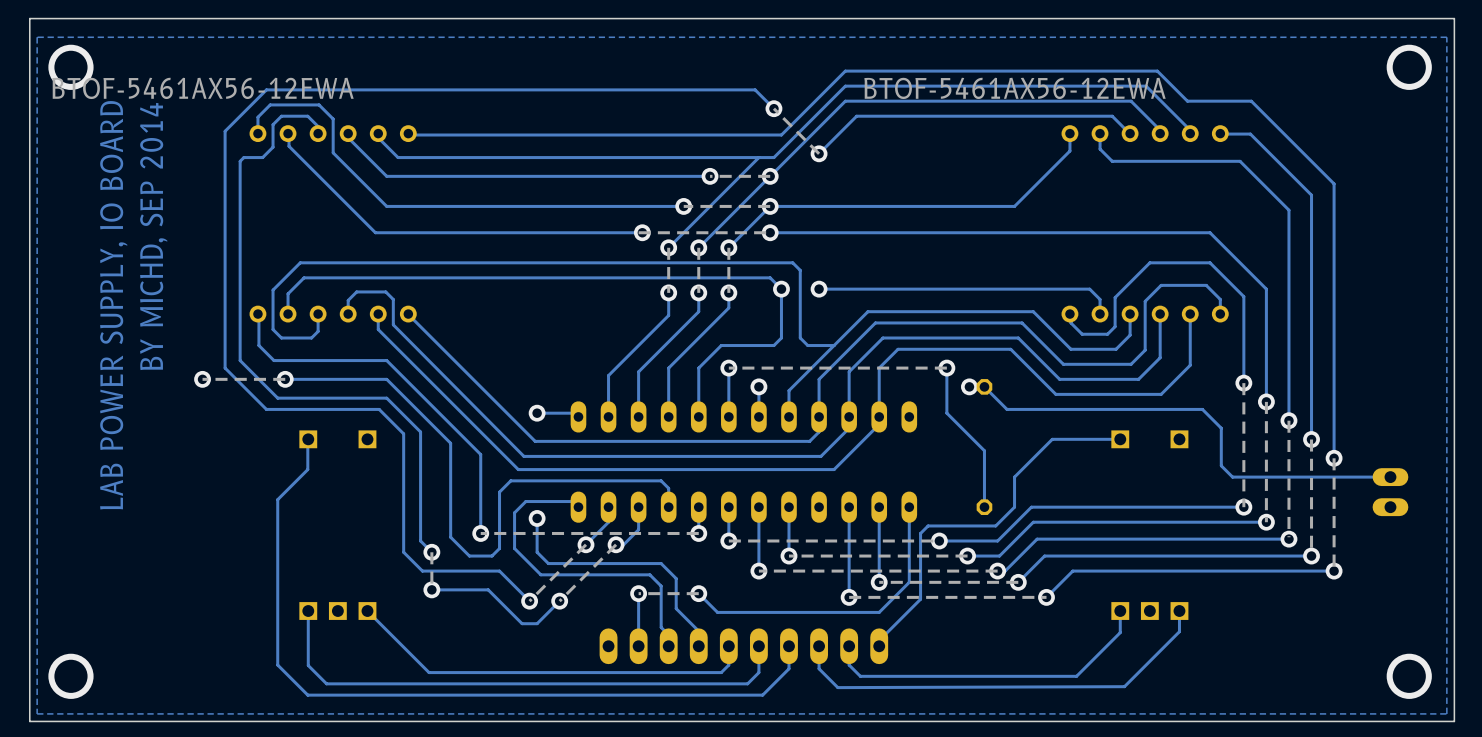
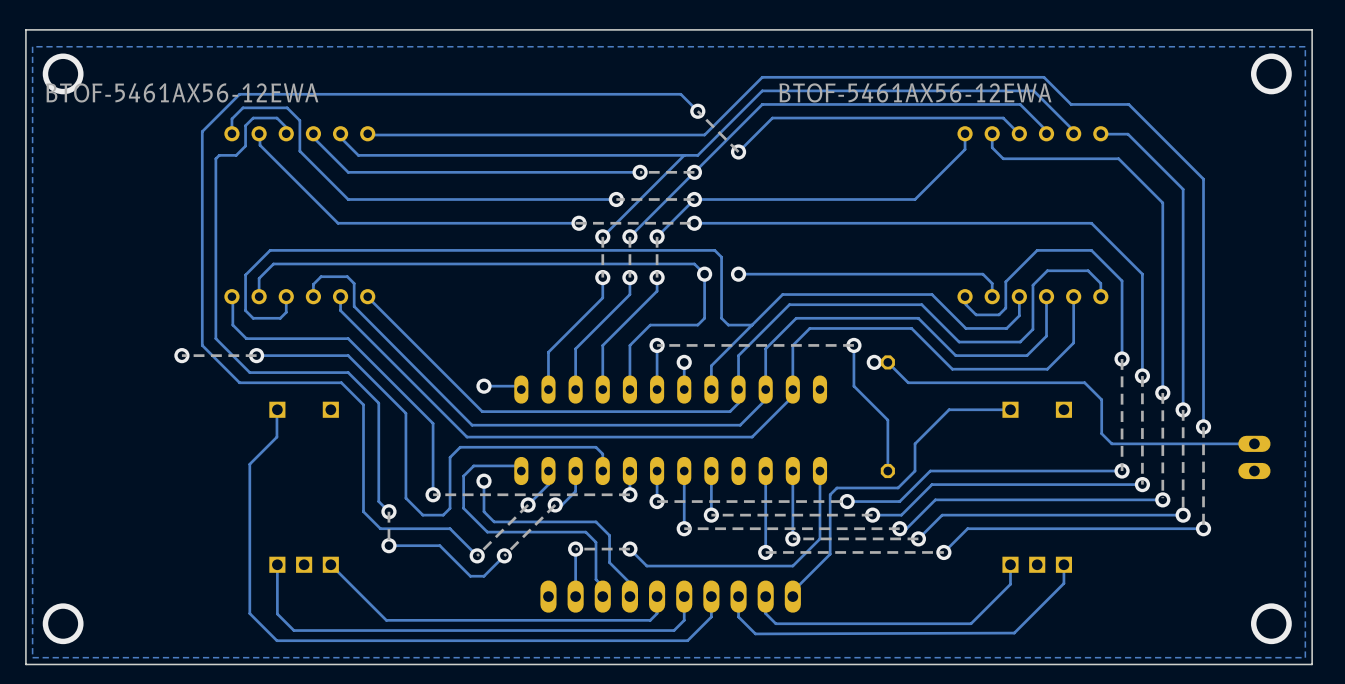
text: BY MICHD, SEP 2014 (153, 236) -> none
text: LAB POWER SUPPLY, IO BOARD (113, 305) -> none

